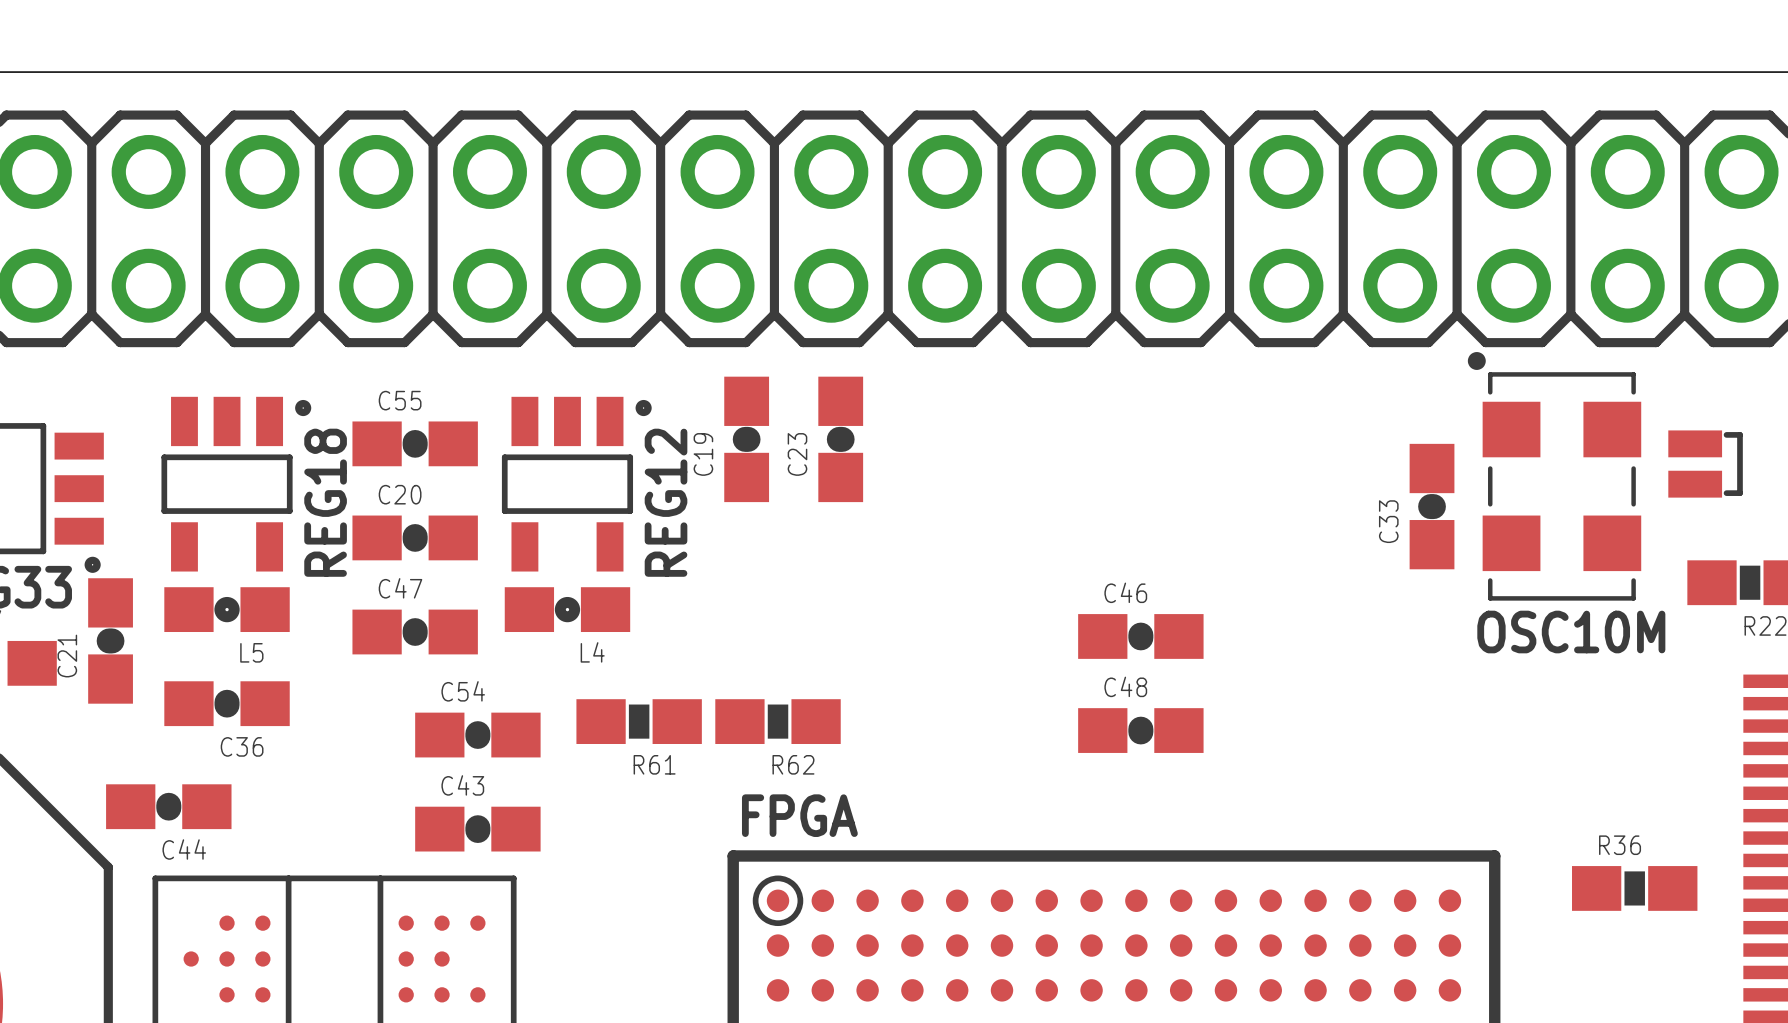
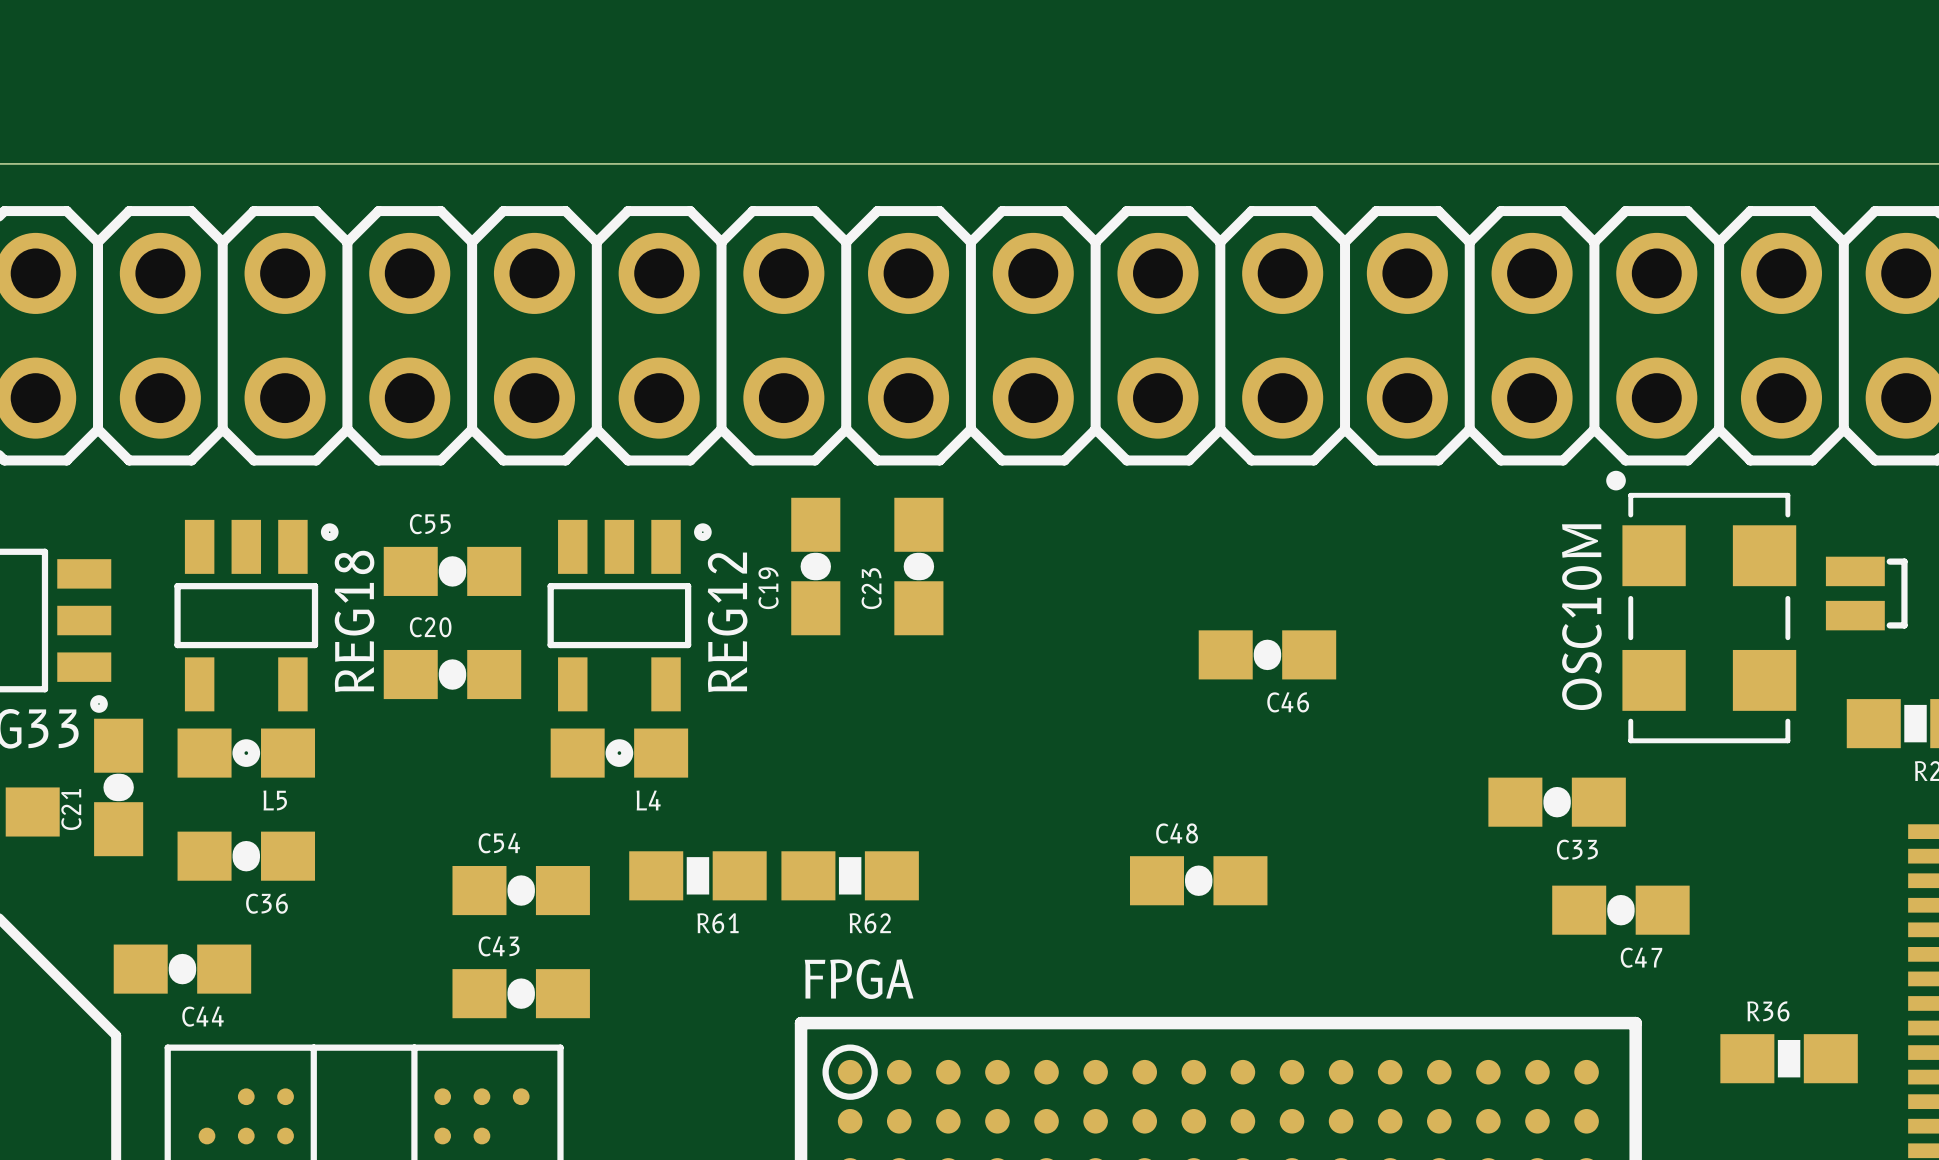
C33 rotation: 0° (1432, 506) -> 90° clockwise (1557, 802)
C33 position: (1432, 506) -> (1557, 802)
C47 name position: C47 (400, 588) -> C47 (1641, 957)
C46 name position: C46 (1125, 592) -> C46 (1288, 702)
C47 position: (415, 632) -> (1620, 910)
OSC10M name rotation: 0° (1571, 632) -> 90° counterclockwise (1581, 617)
C46 position: (1140, 636) -> (1267, 654)
C48 position: (1140, 730) -> (1198, 880)

